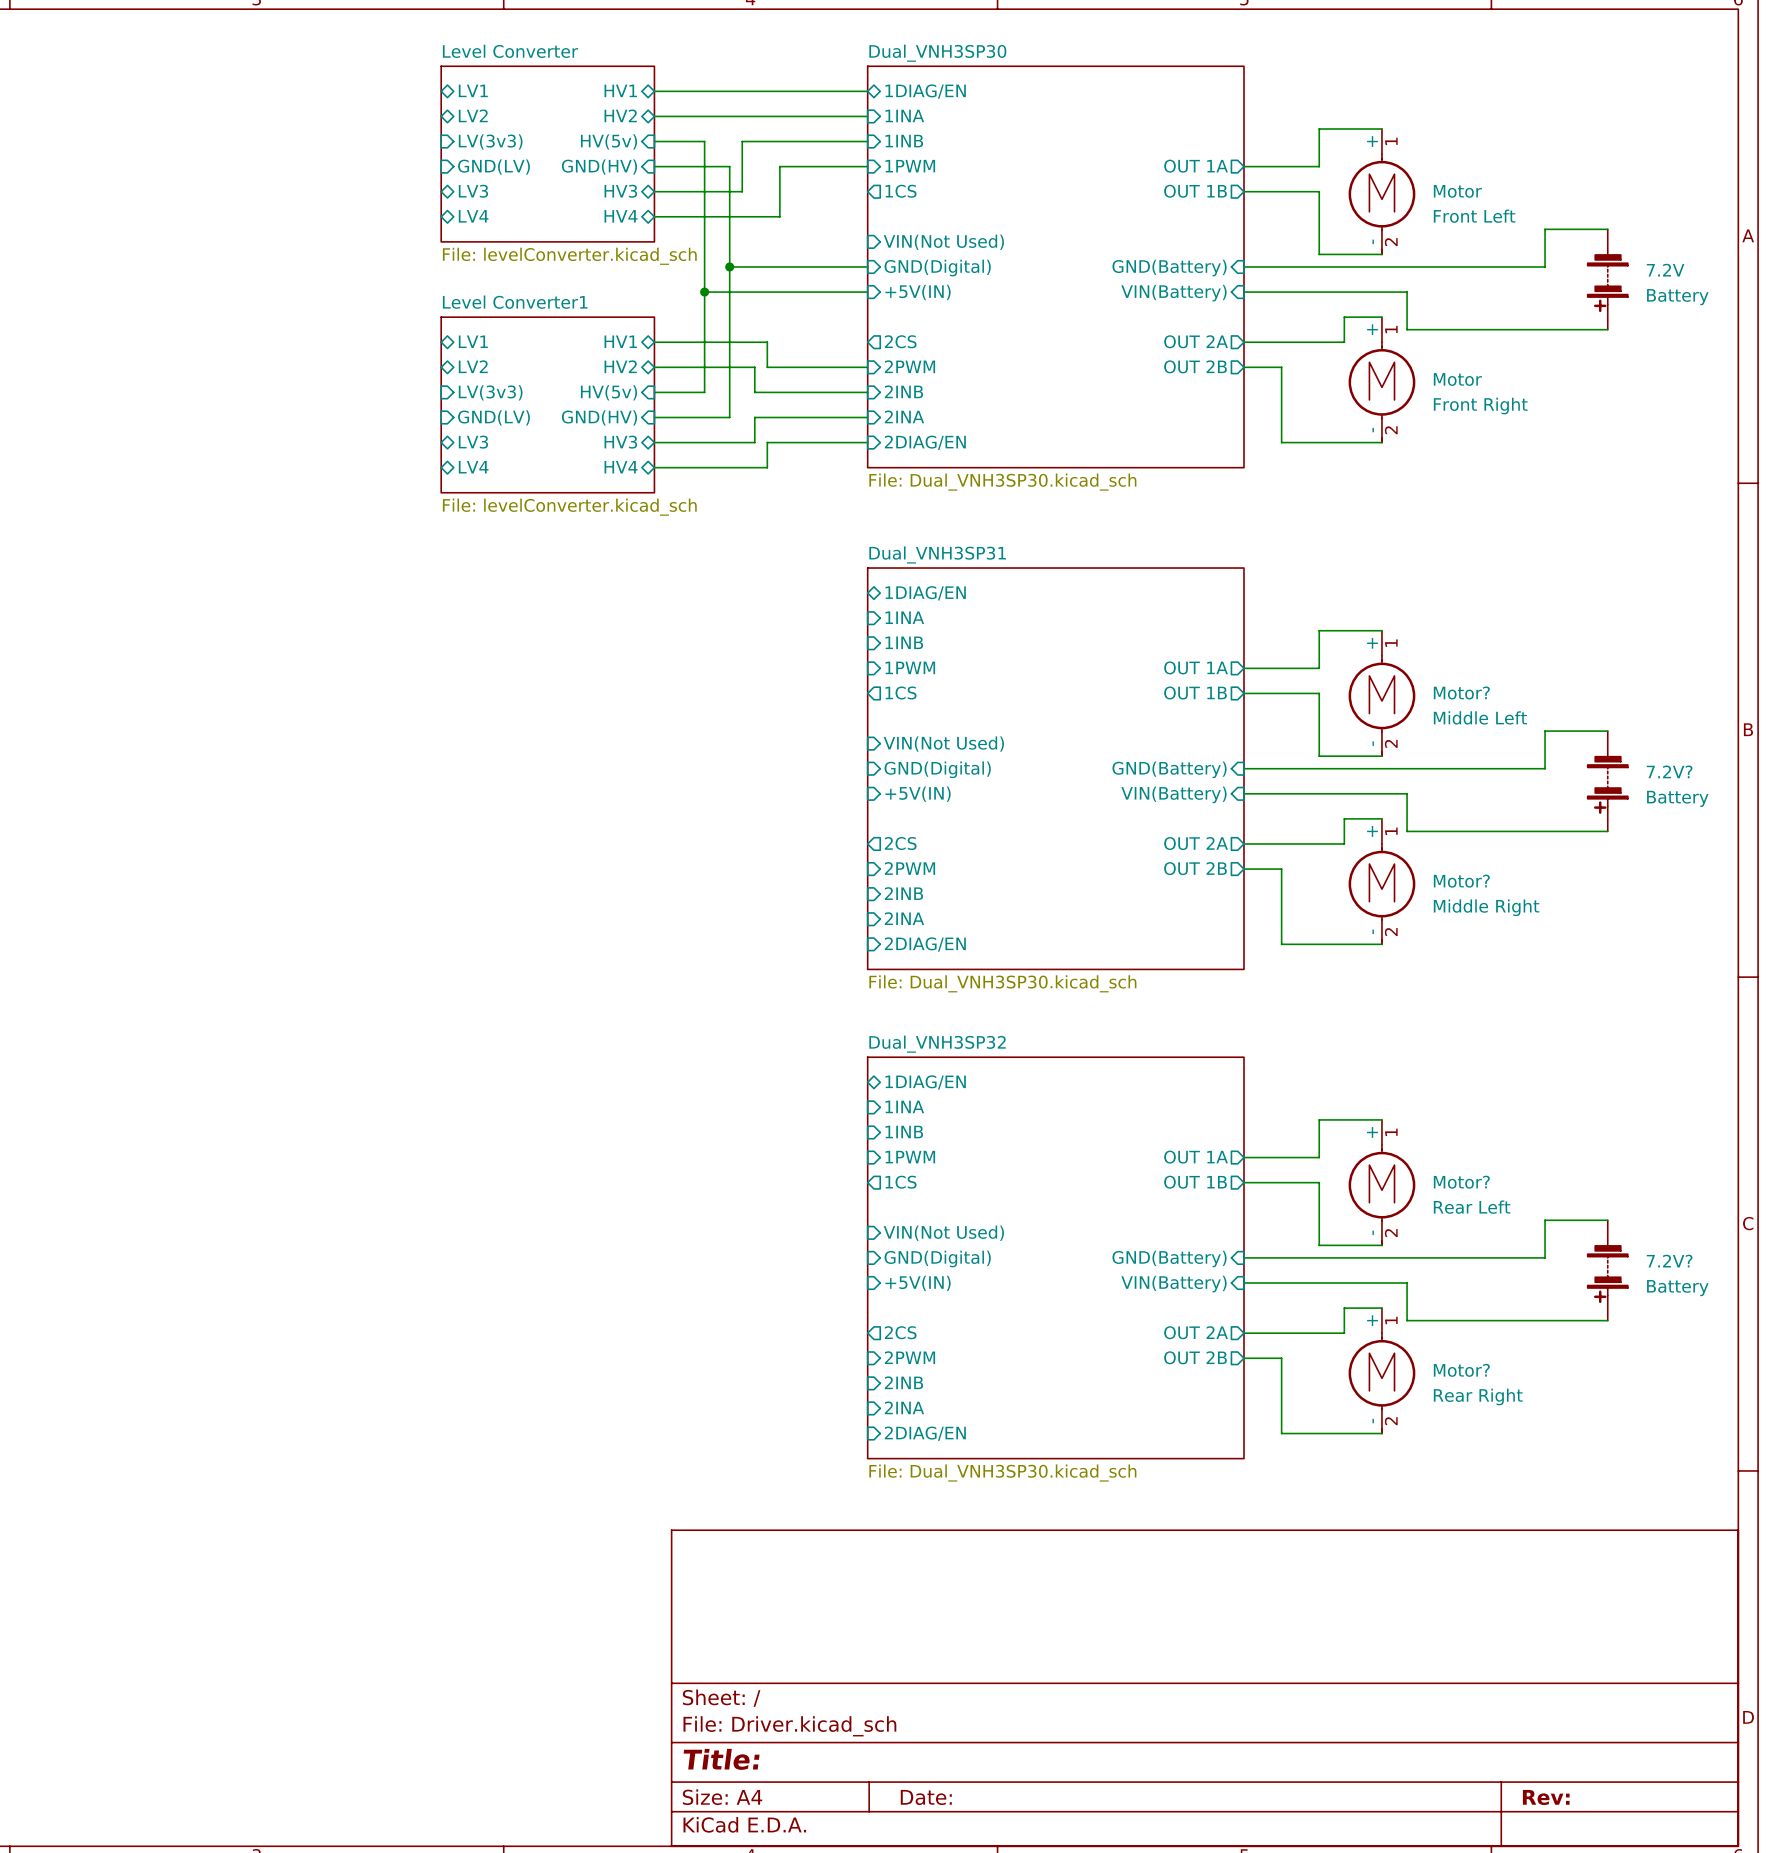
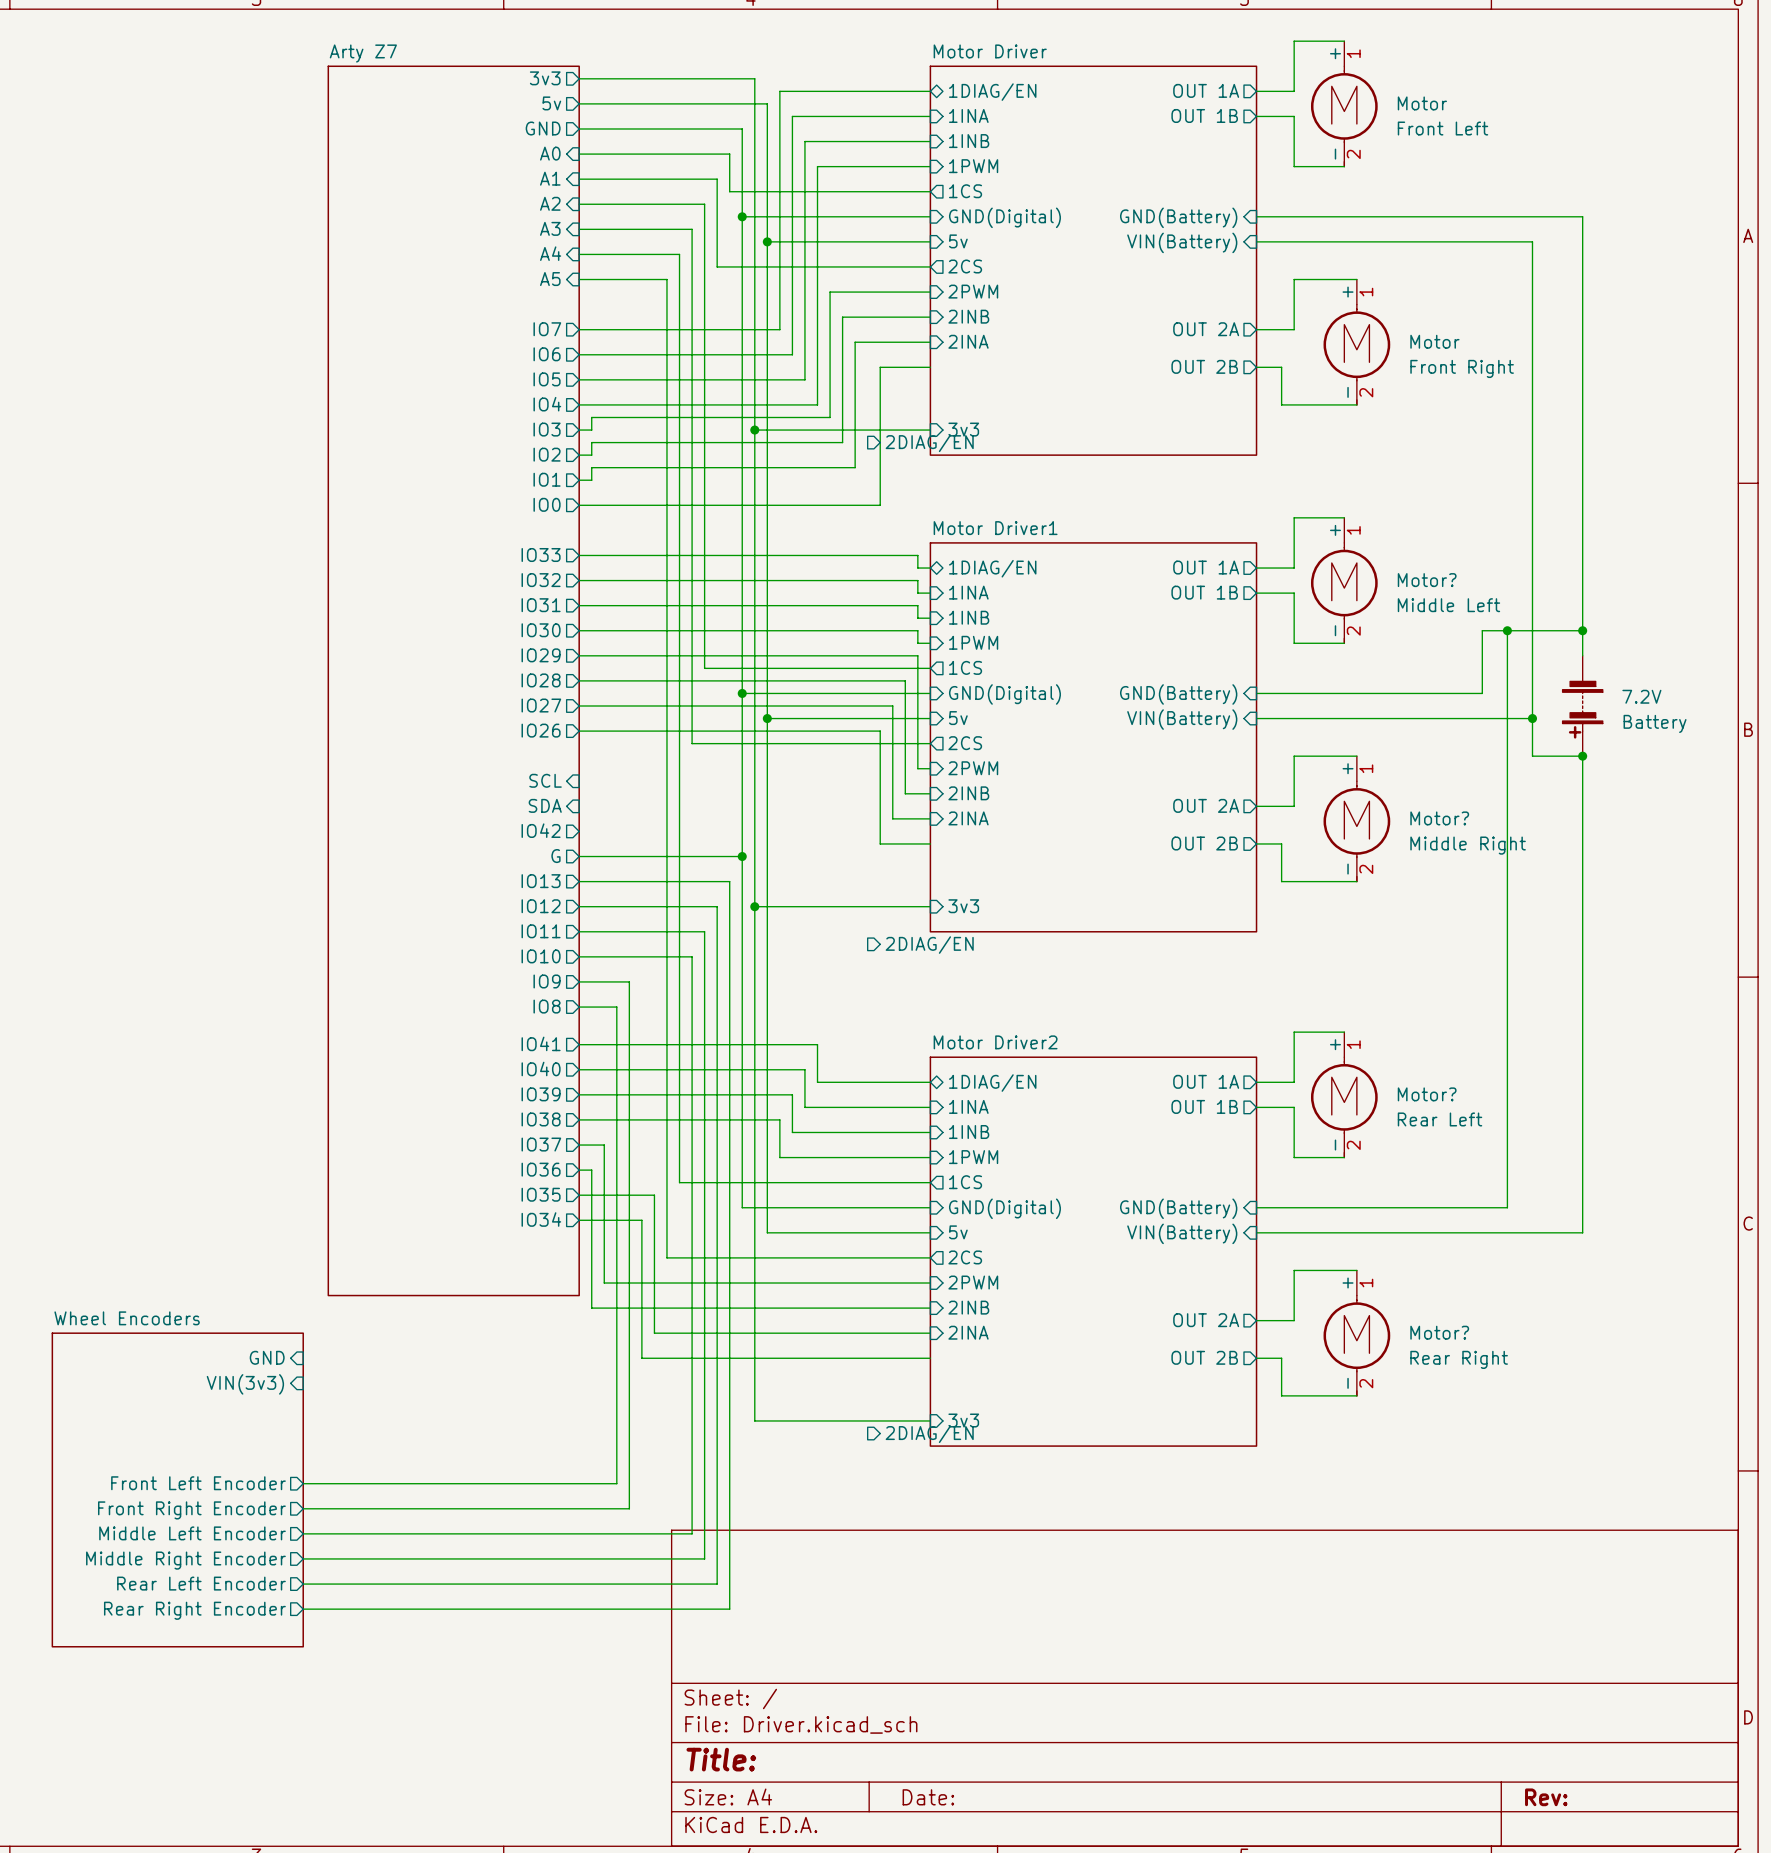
wire: none -> (1344, 41) (1294, 41) (1294, 91) (1256, 91)
sheet pin: none -> 3v3 (545, 78)
sheet pin: LV1 (473, 90) -> none
sheet pin: HV1 (620, 90) -> none
wire: (654, 91) (779, 91) -> none
wire: none -> (867, 91) (930, 91)
sheet pin position: 1DIAG/EN (925, 91) -> 1DIAG/EN (992, 92)
sheet pin: none -> 5v (551, 103)
sheet pin: LV2 (473, 115) -> none
sheet pin: HV2 (620, 115) -> none
sheet pin position: 1INA (904, 115) -> 1INA (968, 115)
wire: (654, 116) (792, 116) -> (579, 354) (792, 354) (792, 116)
wire: none -> (867, 116) (930, 116)
sheet pin: none -> GND (543, 128)
wire: (1381, 128) (1319, 128) (1319, 166) -> (1344, 166) (1319, 166)
sheet pin: LV(3v3) (490, 141) -> none
sheet pin: HV(5v) (608, 141) -> none
wire: (654, 141) (704, 141) (704, 204) -> (579, 204) (704, 204)
wire: (742, 141) (804, 141) -> (742, 141) (742, 128) (579, 128)
wire: none -> (804, 141) (804, 379) (579, 379)
wire: none -> (867, 141) (930, 141)
sheet pin position: 1INB (904, 141) -> 1INB (969, 141)
sheet pin: none -> A0 (550, 153)
sheet Level Converter: File: levelConverter.kicad_sch (547, 154) -> none
wire: (654, 166) (729, 166) -> (579, 154) (729, 154) (729, 166)
wire: (779, 166) (817, 166) -> (779, 166) (779, 91)
wire: none -> (817, 166) (817, 404) (579, 404)
wire: none -> (867, 166) (930, 166)
sheet pin position: 1PWM (910, 166) -> 1PWM (973, 166)
sheet pin position: OUT 1A (1196, 166) -> OUT 1A (1206, 90)
wire: (1243, 166) (1294, 166) -> (1256, 116) (1294, 116) (1294, 166)
sheet pin: GND(LV) (493, 167) -> none
sheet pin: GND(HV) (599, 167) -> none
sheet pin: none -> A1 (550, 178)
wire: none -> (579, 179) (717, 179) (717, 266) (729, 266)
sheet pin: LV3 (473, 191) -> none
sheet pin: HV3 (620, 191) -> none
wire: (654, 191) (729, 191) (729, 417) -> none
sheet pin position: 1CS (901, 191) -> 1CS (965, 191)
wire: none -> (930, 191) (742, 191) (742, 1207) (930, 1207)
sheet pin position: OUT 1B (1195, 191) -> OUT 1B (1204, 115)
wire: (1243, 191) (1319, 191) (1319, 254) (1381, 254) -> none
Motor position: (1381, 191) -> (1344, 103)
sheet pin: none -> A2 (550, 203)
sheet pin: LV4 (473, 216) -> none
sheet pin: HV4 (621, 216) -> none
wire: (654, 216) (742, 216) -> none
junction: none -> (742, 216)
wire: none -> (930, 216) (779, 216) (779, 329) (579, 329)
wire: none -> (1256, 216) (1582, 216) (1582, 655)
sheet pin: none -> A3 (550, 228)
wire: none -> (579, 229) (692, 229) (692, 743) (930, 743)
wire: (1607, 229) (1545, 229) (1545, 266) (1243, 266) -> none
wire: none -> (767, 241) (930, 241)
junction: none -> (767, 241)
sheet pin: none -> 5v (958, 241)
wire: none -> (1256, 241) (1532, 241) (1532, 756) (1582, 756) (1582, 1232) (1256, 1232)
sheet pin: VIN(Not Used) (943, 242) -> none
sheet pin: none -> A4 (550, 253)
wire: none -> (579, 254) (679, 254) (679, 1182) (930, 1182)
sheet Motor Driver: none -> (1093, 260)
junction: (729, 266) -> none
wire: none -> (867, 266) (930, 266)
sheet Dual_VNH3SP30: File: Dual_VNH3SP30.kicad_sch (1055, 266) -> none
sheet pin position: GND(Digital) (937, 268) -> GND(Digital) (1004, 217)
sheet pin position: GND(Battery) (1169, 268) -> GND(Battery) (1178, 217)
sheet pin: none -> A5 (550, 279)
wire: none -> (579, 279) (666, 279) (666, 1257) (930, 1257)
wire: none -> (1356, 279) (1294, 279) (1294, 329) (1256, 329)
7.2V position: (1607, 279) -> (1582, 706)
wire: (704, 292) (830, 292) -> none
junction: (704, 292) -> none
wire: none -> (867, 292) (930, 292)
sheet pin: +5V(IN) (918, 292) -> none
wire: (1243, 292) (1407, 292) (1407, 329) (1607, 329) -> none
sheet pin position: VIN(Battery) (1173, 293) -> VIN(Battery) (1182, 242)
wire: (1381, 317) (1344, 317) (1344, 342) (1243, 342) -> none
sheet pin: none -> IO7 (547, 329)
sheet pin: LV1 (473, 341) -> none
sheet pin: HV1 (620, 341) -> none
sheet pin position: 2CS (900, 341) -> 2CS (965, 266)
sheet pin position: OUT 2A (1196, 341) -> OUT 2A (1206, 329)
wire: (654, 342) (767, 342) -> (579, 103) (767, 103) (767, 342)
wire: none -> (930, 342) (855, 342) (855, 467) (767, 467) (767, 1232) (930, 1232)
sheet pin: none -> IO6 (547, 354)
sheet pin: LV2 (473, 366) -> none
sheet pin: HV2 (620, 366) -> none
sheet pin position: 2PWM (909, 366) -> 2PWM (973, 291)
sheet pin position: OUT 2B (1195, 366) -> OUT 2B (1204, 366)
wire: (654, 367) (754, 367) -> (579, 78) (754, 78) (754, 367)
wire: (767, 367) (867, 367) -> (767, 367) (767, 442) (754, 442) (754, 1420) (930, 1420)
wire: none -> (930, 367) (880, 367) (880, 505) (579, 505)
wire: (1243, 367) (1256, 367) -> none
sheet pin: none -> IO5 (547, 379)
Motor position: (1381, 379) -> (1356, 342)
sheet pin position: 2INB (903, 391) -> 2INB (968, 316)
sheet pin: LV(3v3) (490, 392) -> none
sheet pin: HV(5v) (608, 392) -> none
wire: (654, 392) (704, 392) -> (930, 668) (704, 668) (704, 392)
wire: (754, 392) (867, 392) -> (754, 392) (754, 417) (729, 417)
sheet Level Converter1: File: levelConverter.kicad_sch (547, 404) -> none
sheet pin: none -> IO4 (547, 404)
wire: (1281, 404) (1281, 442) (1381, 442) -> (1281, 404) (1356, 404)
sheet pin position: 2INA (904, 416) -> 2INA (968, 341)
sheet pin: GND(LV) (493, 417) -> none
sheet pin: GND(HV) (599, 417) -> none
wire: none -> (654, 417) (591, 417) (591, 430) (579, 430)
wire: (830, 417) (867, 417) -> (830, 417) (830, 292)
sheet pin: none -> IO3 (547, 429)
sheet pin: none -> 3v3 (963, 429)
wire: none -> (754, 430) (930, 430)
junction: none -> (754, 430)
sheet pin: LV3 (473, 442) -> none
sheet pin: HV3 (620, 442) -> none
wire: none -> (654, 442) (591, 442) (591, 455) (579, 455)
wire: (842, 442) (867, 442) -> (842, 442) (842, 317) (930, 317)
sheet pin: none -> IO2 (547, 454)
sheet pin: LV4 (473, 467) -> none
sheet pin: HV4 (621, 467) -> none
wire: none -> (654, 467) (591, 467) (591, 480) (579, 480)
sheet pin: none -> IO1 (547, 479)
sheet pin: none -> IO0 (547, 504)
wire: none -> (1344, 517) (1294, 517) (1294, 568) (1256, 568)
sheet pin: none -> IO33 (541, 555)
wire: none -> (579, 555) (917, 555) (917, 568) (930, 568)
sheet pin: none -> IO32 (541, 580)
wire: none -> (579, 580) (917, 580) (917, 593) (930, 593)
sheet pin position: 1DIAG/EN (925, 593) -> 1DIAG/EN (992, 568)
wire: none -> (1256, 593) (1294, 593) (1294, 643) (1344, 643)
sheet pin: none -> IO31 (541, 605)
wire: none -> (579, 605) (917, 605) (917, 618) (930, 618)
sheet pin position: 1INA (904, 617) -> 1INA (968, 592)
sheet pin: none -> IO30 (541, 630)
wire: none -> (579, 630) (917, 630) (917, 643) (930, 643)
wire: (1381, 630) (1319, 630) (1319, 668) (1243, 668) -> none
wire: none -> (1507, 630) (1507, 1207) (1256, 1207)
junction: none -> (1507, 630)
wire: none -> (1582, 630) (1482, 630) (1482, 693) (1319, 693)
junction: none -> (1582, 630)
sheet pin position: 1INB (904, 642) -> 1INB (969, 617)
sheet pin: none -> IO29 (541, 655)
wire: none -> (579, 655) (917, 655) (917, 768) (930, 768)
sheet pin position: 1PWM (910, 667) -> 1PWM (973, 642)
sheet pin position: OUT 1A (1196, 667) -> OUT 1A (1206, 567)
sheet Arty Z7: none -> (453, 680)
sheet pin: none -> IO28 (541, 680)
wire: none -> (579, 680) (905, 680) (905, 793) (930, 793)
sheet pin position: 1CS (901, 692) -> 1CS (965, 667)
sheet pin position: OUT 1B (1195, 692) -> OUT 1B (1204, 592)
wire: none -> (742, 693) (930, 693)
junction: none -> (742, 693)
wire: (1243, 693) (1256, 693) -> none
wire: (1319, 693) (1319, 756) -> (1256, 806) (1294, 806) (1294, 756) (1319, 756)
Motor? position: (1381, 693) -> (1344, 580)
sheet pin: none -> IO27 (541, 705)
wire: none -> (579, 706) (892, 706) (892, 818) (930, 818)
wire: none -> (767, 718) (930, 718)
junction: none -> (767, 718)
sheet pin: none -> 5v (958, 718)
wire: none -> (1256, 718) (1532, 718)
junction: none -> (1532, 718)
sheet pin: none -> IO26 (541, 730)
wire: none -> (579, 731) (880, 731) (880, 843) (930, 843)
wire: (1607, 731) (1545, 731) (1545, 768) (1243, 768) -> none
sheet Motor Driver1: none -> (1093, 737)
sheet pin: VIN(Not Used) (943, 744) -> none
wire: (1356, 756) (1381, 756) -> none
junction: none -> (1582, 756)
sheet Dual_VNH3SP31: File: Dual_VNH3SP30.kicad_sch (1055, 768) -> none
sheet pin position: GND(Digital) (937, 769) -> GND(Digital) (1004, 694)
sheet pin position: GND(Battery) (1169, 769) -> GND(Battery) (1178, 694)
sheet pin: none -> SCL (545, 780)
7.2V?: Battery (1607, 781) -> none
wire: (1243, 793) (1407, 793) (1407, 831) (1607, 831) -> none
sheet pin: +5V(IN) (918, 794) -> none
sheet pin position: VIN(Battery) (1173, 794) -> VIN(Battery) (1182, 719)
sheet pin: none -> SDA (545, 805)
wire: (1381, 818) (1344, 818) (1344, 843) (1281, 843) -> none
sheet pin: none -> IO42 (541, 830)
sheet pin position: 2CS (900, 843) -> 2CS (965, 743)
sheet pin position: OUT 2A (1196, 843) -> OUT 2A (1206, 805)
wire: (1243, 843) (1256, 843) -> none
sheet pin: none -> G (555, 856)
wire: none -> (579, 856) (742, 856)
junction: none -> (742, 856)
sheet pin position: 2PWM (909, 868) -> 2PWM (973, 768)
sheet pin position: OUT 2B (1195, 868) -> OUT 2B (1204, 843)
wire: (1243, 869) (1281, 869) -> (1281, 843) (1281, 869)
sheet pin: none -> IO13 (541, 881)
wire: none -> (579, 881) (729, 881) (729, 1609) (303, 1609)
wire: (1281, 881) (1281, 944) (1381, 944) -> (1281, 881) (1356, 881)
Motor? position: (1381, 881) -> (1356, 818)
sheet pin position: 2INB (903, 893) -> 2INB (968, 793)
sheet pin: none -> IO12 (541, 906)
wire: none -> (579, 906) (717, 906) (717, 1584) (303, 1584)
wire: none -> (754, 906) (930, 906)
junction: none -> (754, 906)
sheet pin: none -> 3v3 (963, 906)
sheet pin position: 2INA (904, 918) -> 2INA (968, 818)
sheet pin: none -> IO11 (541, 931)
wire: none -> (579, 931) (704, 931) (704, 1558) (303, 1558)
sheet pin: none -> IO10 (541, 956)
wire: none -> (579, 956) (692, 956) (692, 1533) (303, 1533)
sheet pin: none -> IO9 (547, 981)
wire: none -> (579, 981) (629, 981) (629, 1508) (303, 1508)
sheet pin: none -> IO8 (547, 1006)
wire: none -> (579, 1007) (616, 1007) (616, 1483) (303, 1483)
wire: none -> (1344, 1032) (1294, 1032) (1294, 1082) (1256, 1082)
sheet pin: none -> IO41 (541, 1043)
wire: none -> (579, 1044) (817, 1044) (817, 1082) (930, 1082)
sheet pin: none -> IO40 (541, 1068)
wire: none -> (579, 1069) (804, 1069) (804, 1107) (930, 1107)
sheet pin position: 1DIAG/EN (925, 1082) -> 1DIAG/EN (992, 1083)
sheet pin: none -> IO39 (541, 1094)
wire: none -> (579, 1094) (792, 1094) (792, 1132) (930, 1132)
sheet pin position: 1INA (904, 1106) -> 1INA (968, 1106)
sheet pin: none -> IO38 (541, 1119)
wire: none -> (579, 1119) (779, 1119) (779, 1157) (930, 1157)
wire: (1381, 1119) (1319, 1119) (1319, 1157) -> (1344, 1157) (1319, 1157)
sheet pin position: 1INB (904, 1132) -> 1INB (969, 1132)
sheet pin: none -> IO37 (541, 1144)
wire: none -> (579, 1145) (604, 1145) (604, 1283) (930, 1283)
sheet pin position: 1PWM (910, 1157) -> 1PWM (973, 1157)
sheet pin position: OUT 1A (1196, 1157) -> OUT 1A (1206, 1081)
wire: (1243, 1157) (1294, 1157) -> (1256, 1107) (1294, 1107) (1294, 1157)
sheet pin: none -> IO36 (541, 1169)
wire: none -> (579, 1170) (591, 1170) (591, 1308) (930, 1308)
sheet pin position: 1CS (901, 1182) -> 1CS (965, 1182)
sheet pin position: OUT 1B (1195, 1182) -> OUT 1B (1204, 1106)
wire: (1243, 1182) (1319, 1182) (1319, 1245) (1381, 1245) -> none
Motor? position: (1381, 1182) -> (1344, 1094)
sheet pin: none -> IO35 (541, 1194)
wire: none -> (579, 1195) (654, 1195) (654, 1333) (930, 1333)
sheet pin: none -> IO34 (541, 1219)
wire: none -> (579, 1220) (641, 1220) (641, 1358) (930, 1358)
wire: (1607, 1220) (1545, 1220) (1545, 1257) (1243, 1257) -> none
sheet pin: none -> 5v (958, 1232)
sheet pin: VIN(Not Used) (943, 1233) -> none
sheet Motor Driver2: none -> (1093, 1251)
sheet Dual_VNH3SP32: File: Dual_VNH3SP30.kicad_sch (1055, 1257) -> none
sheet pin position: GND(Digital) (937, 1258) -> GND(Digital) (1004, 1208)
sheet pin position: GND(Battery) (1169, 1258) -> GND(Battery) (1178, 1208)
wire: none -> (1356, 1270) (1294, 1270) (1294, 1320) (1256, 1320)
7.2V?: Battery (1607, 1270) -> none
sheet pin: +5V(IN) (918, 1283) -> none
wire: (1243, 1283) (1407, 1283) (1407, 1320) (1607, 1320) -> none
sheet pin position: VIN(Battery) (1173, 1284) -> VIN(Battery) (1182, 1233)
wire: (1381, 1308) (1344, 1308) (1344, 1333) (1243, 1333) -> none
sheet pin position: 2CS (900, 1332) -> 2CS (965, 1257)
sheet pin position: OUT 2A (1196, 1332) -> OUT 2A (1206, 1320)
sheet pin: none -> GND (267, 1357)
sheet pin position: 2PWM (909, 1357) -> 2PWM (973, 1282)
sheet pin position: OUT 2B (1195, 1357) -> OUT 2B (1204, 1357)
wire: (1243, 1358) (1256, 1358) -> none
Motor? position: (1381, 1370) -> (1356, 1333)
sheet pin position: 2INB (903, 1382) -> 2INB (968, 1307)
sheet pin: none -> VIN(3v3) (245, 1384)
wire: (1281, 1395) (1281, 1433) (1381, 1433) -> (1281, 1395) (1356, 1395)
sheet pin position: 2INA (904, 1407) -> 2INA (968, 1332)
sheet pin: none -> 3v3 (963, 1420)
sheet pin: none -> Front Left Encoder (198, 1483)
sheet Wheel Encoders: none -> (177, 1489)
sheet pin: none -> Front Right Encoder (191, 1510)
sheet pin: none -> Middle Left Encoder (192, 1533)
sheet pin: none -> Middle Right Encoder (185, 1560)
sheet pin: none -> Rear Left Encoder (201, 1583)
sheet pin: none -> Rear Right Encoder (194, 1610)

